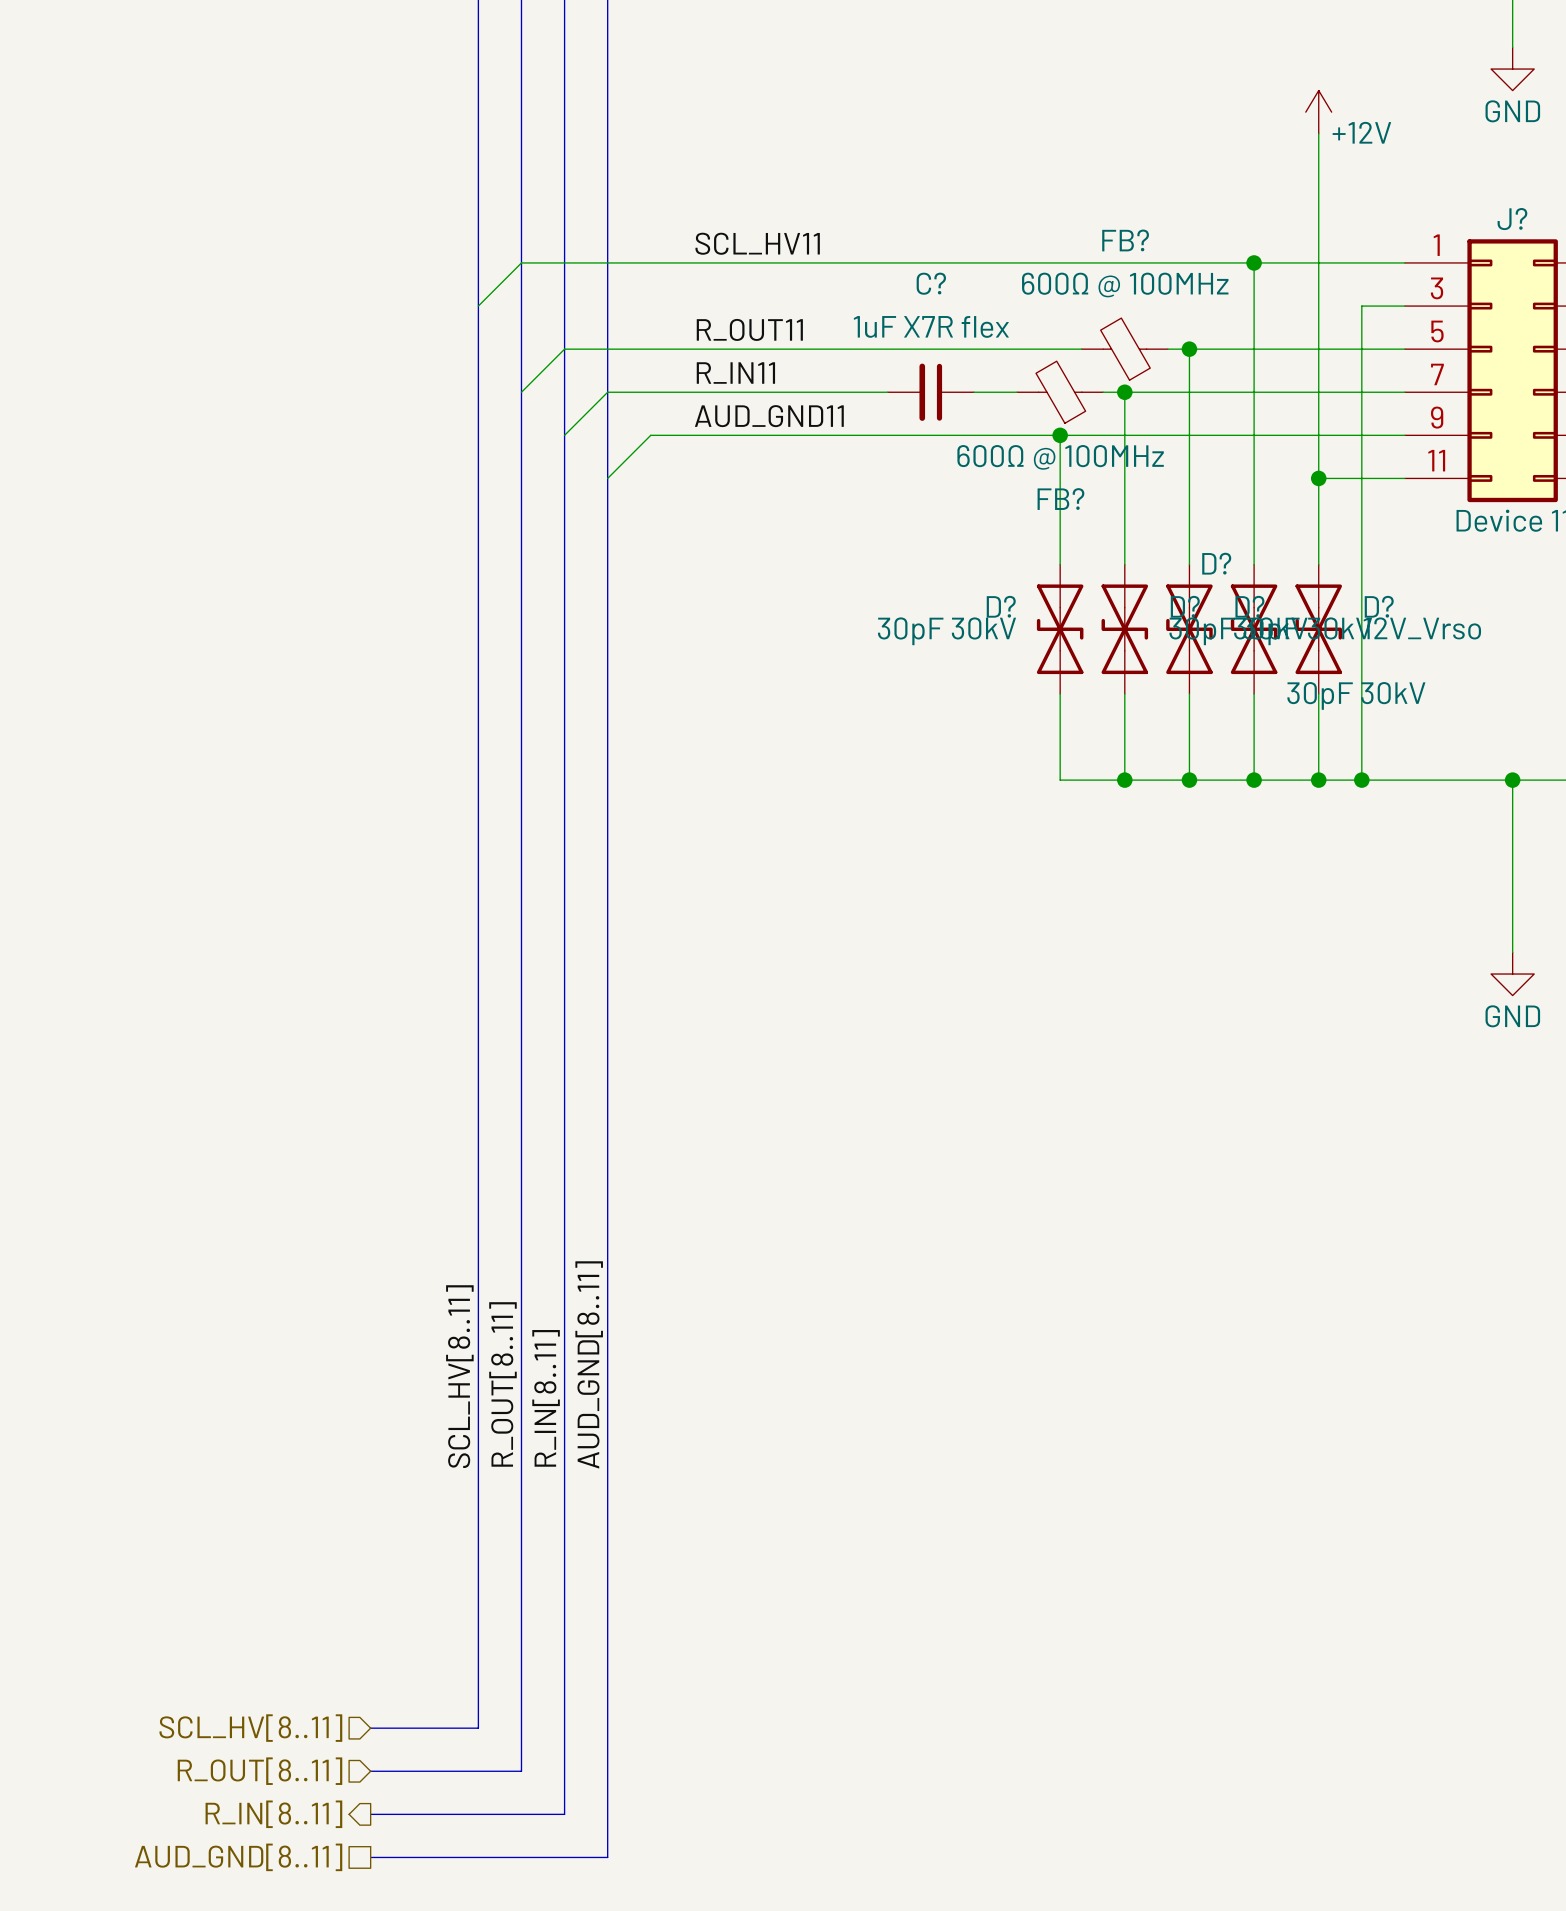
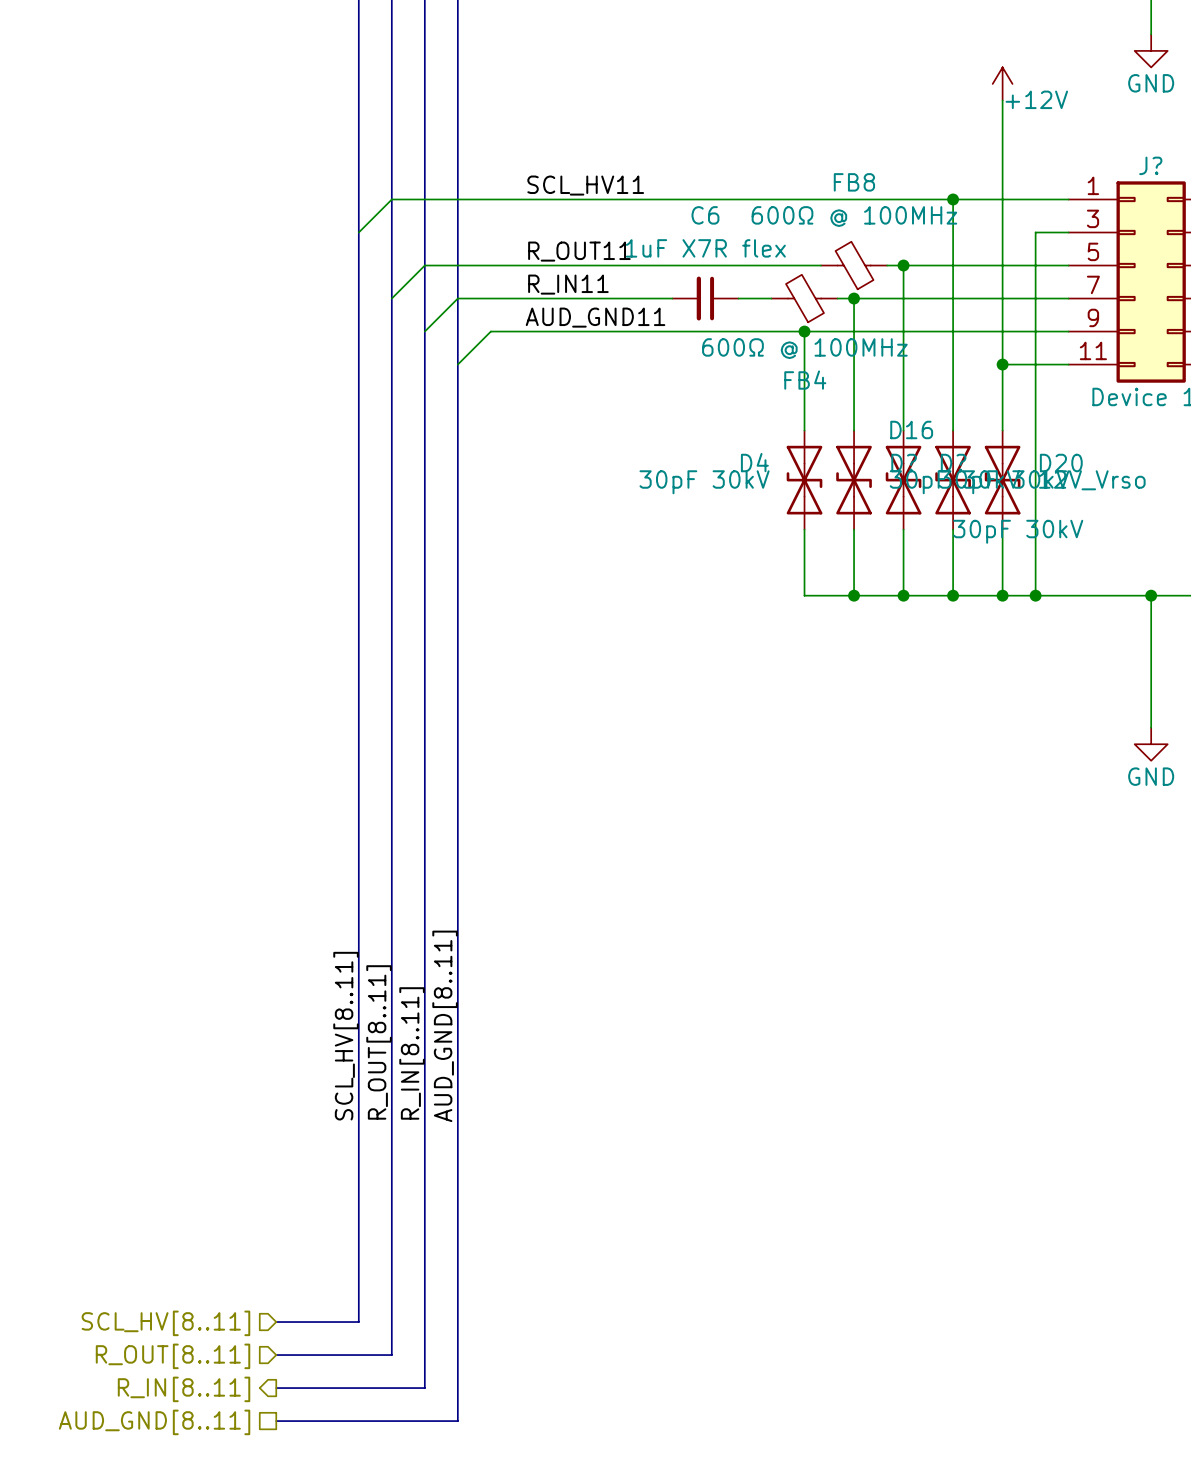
FB? name: FB? (1125, 240) -> FB8 (854, 182)
C? name: C? (931, 283) -> C6 (705, 215)
FB? name: FB? (1060, 499) -> FB4 (805, 380)
D? name: D? (1216, 563) -> D16 (911, 429)
D? name: D? (1001, 606) -> D4 (754, 462)
D? name: D? (1379, 606) -> D20 (1061, 462)

